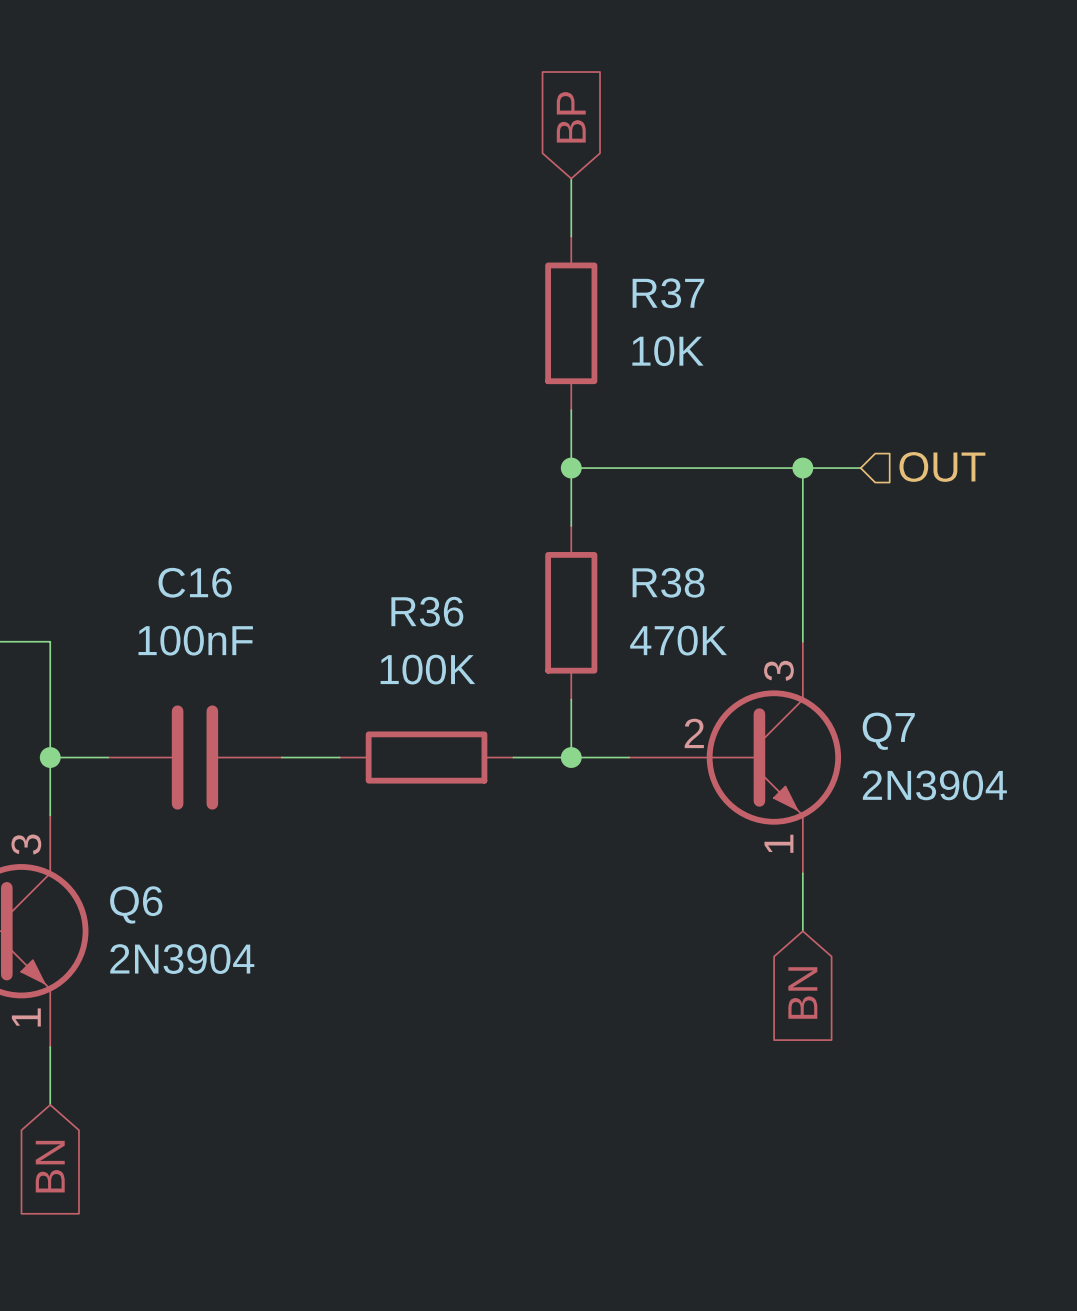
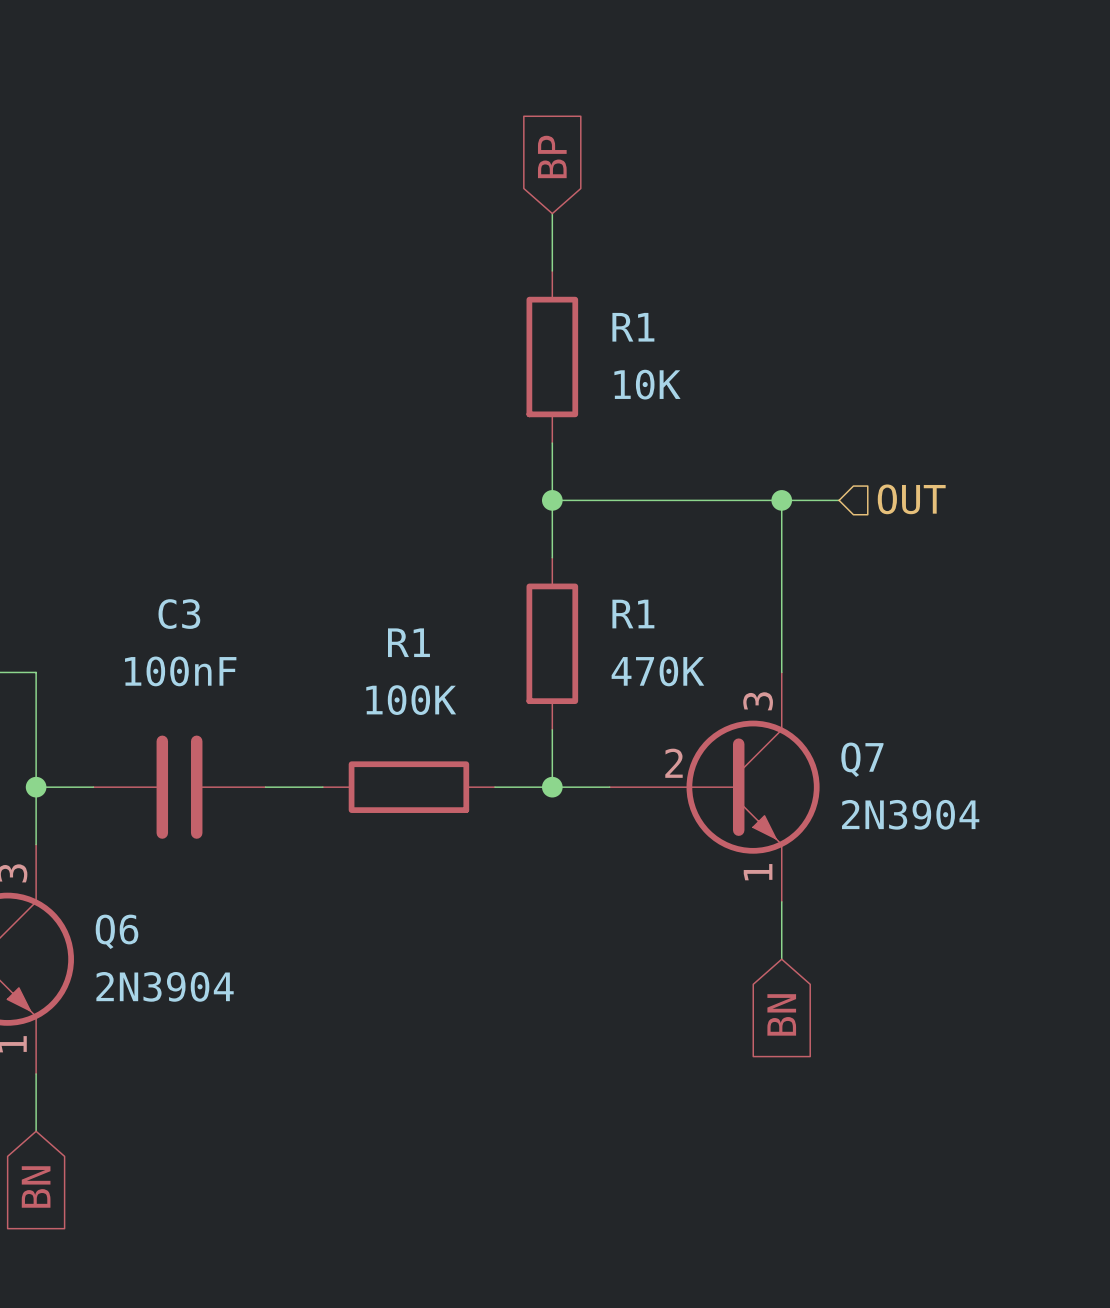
R37 name: R37 (668, 293) -> R1 (633, 327)
C16 name: C16 (195, 582) -> C3 (179, 614)
R38 name: R38 (668, 582) -> R1 (633, 614)
R36 name: R36 (427, 611) -> R1 (408, 642)

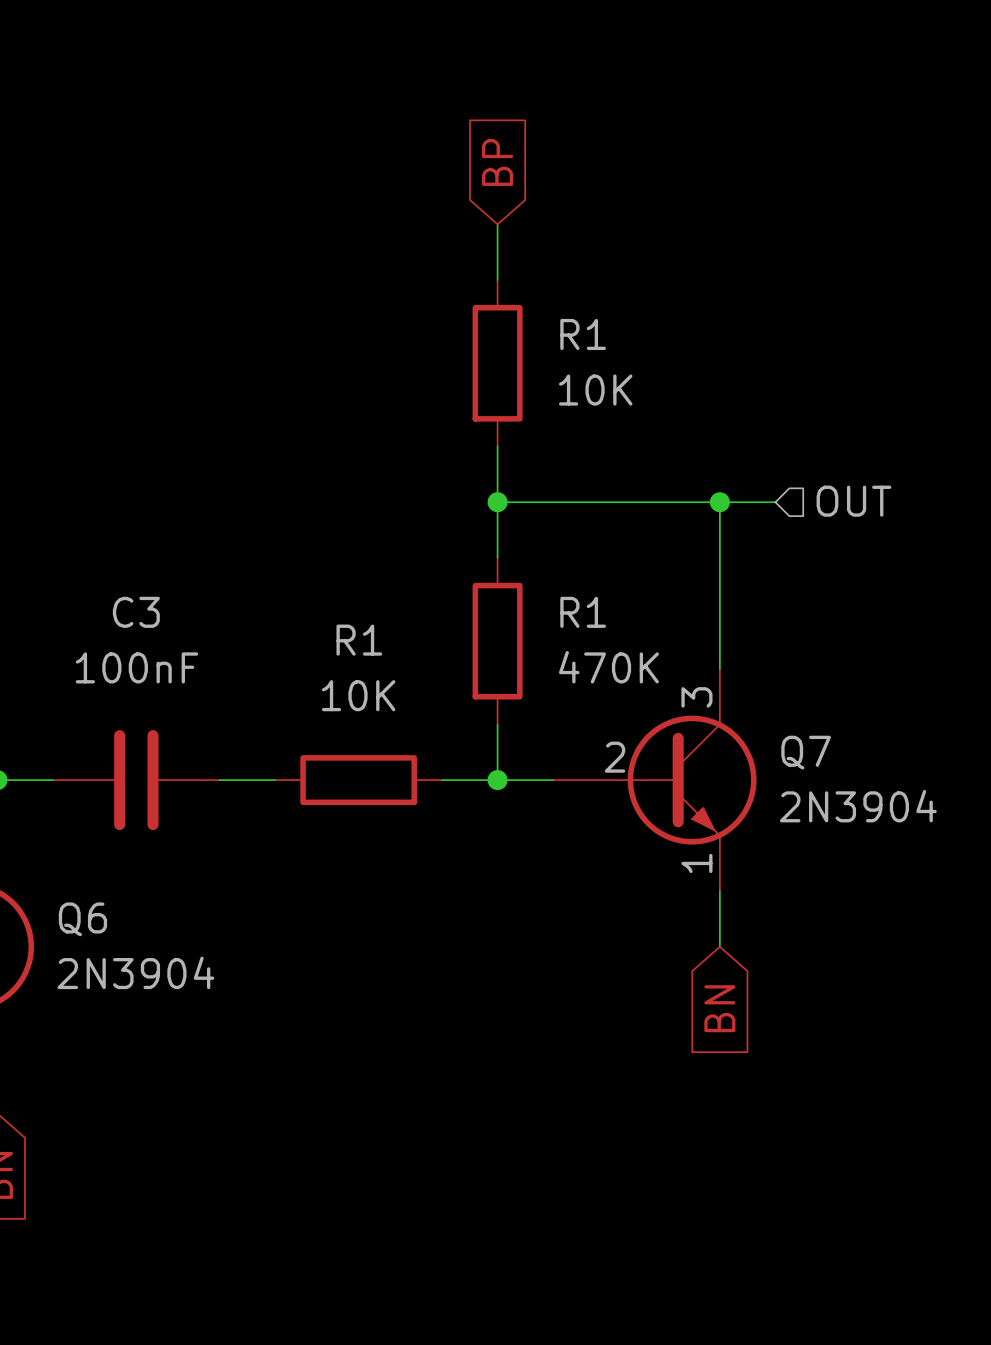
R1 value: 100K (411, 700) -> 10K (358, 695)

